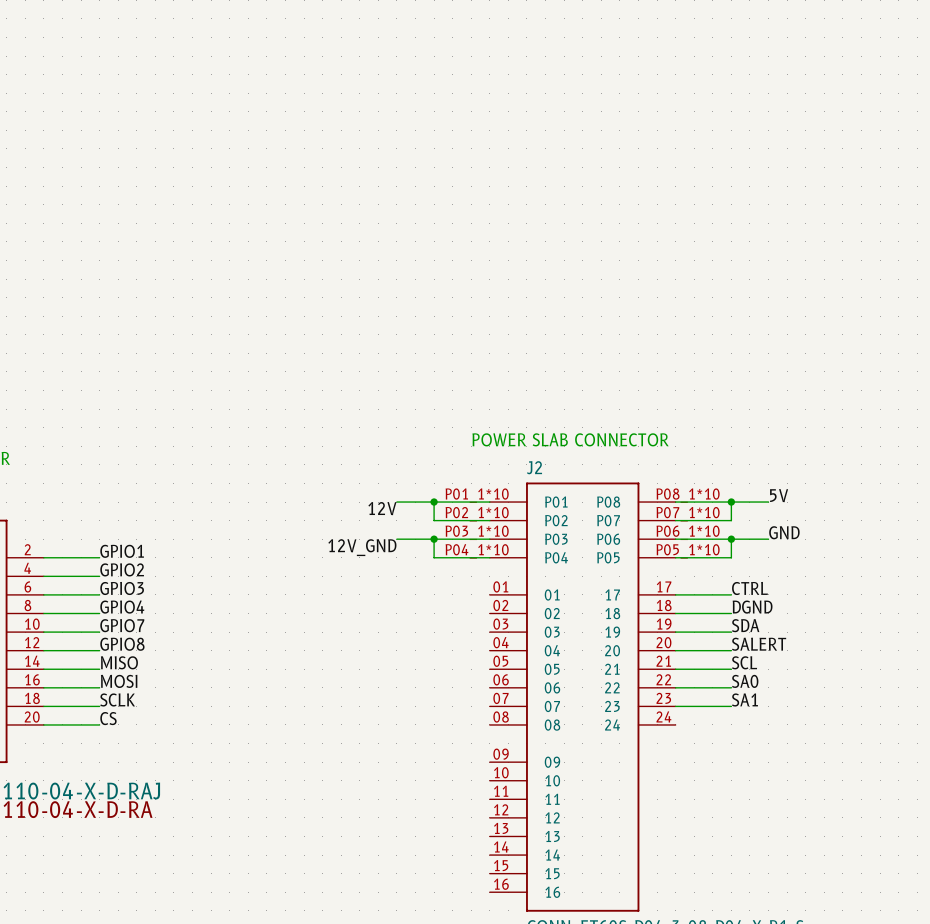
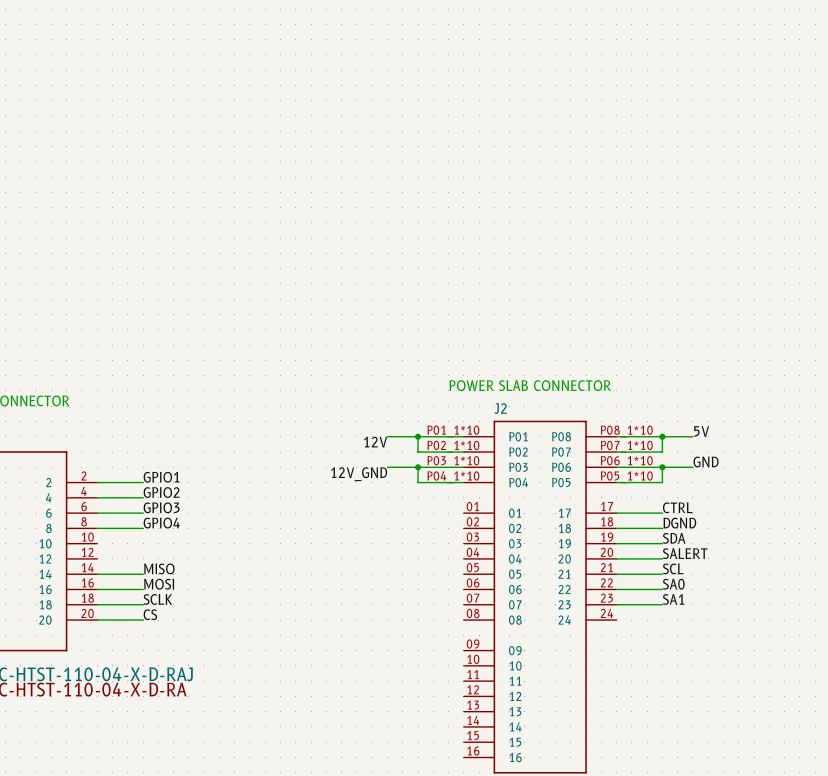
label: GPIO7 (122, 625) -> none
wire: (43, 632) (99, 632) -> none
label: GPIO8 (122, 644) -> none
wire: (43, 650) (99, 650) -> none

